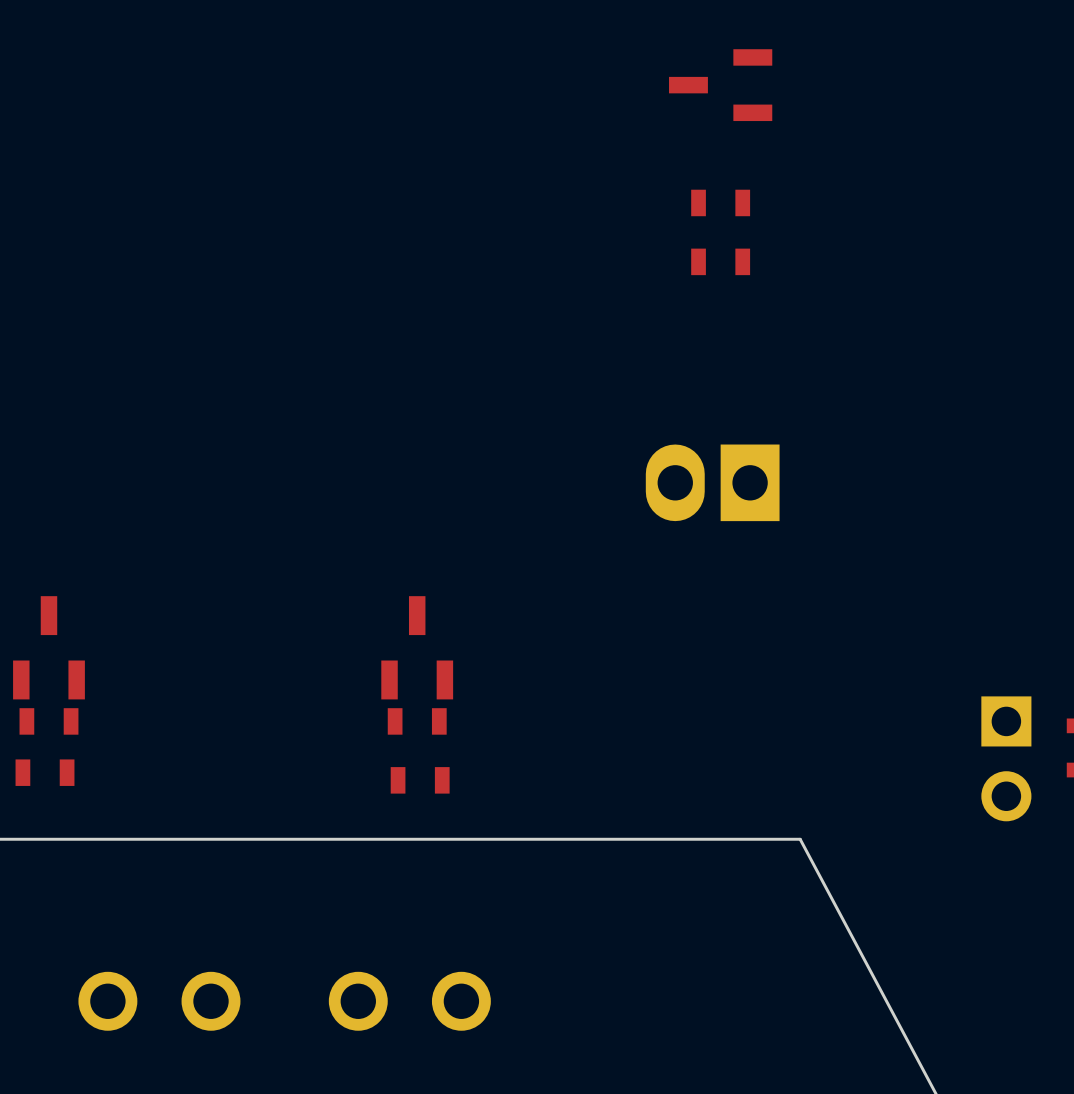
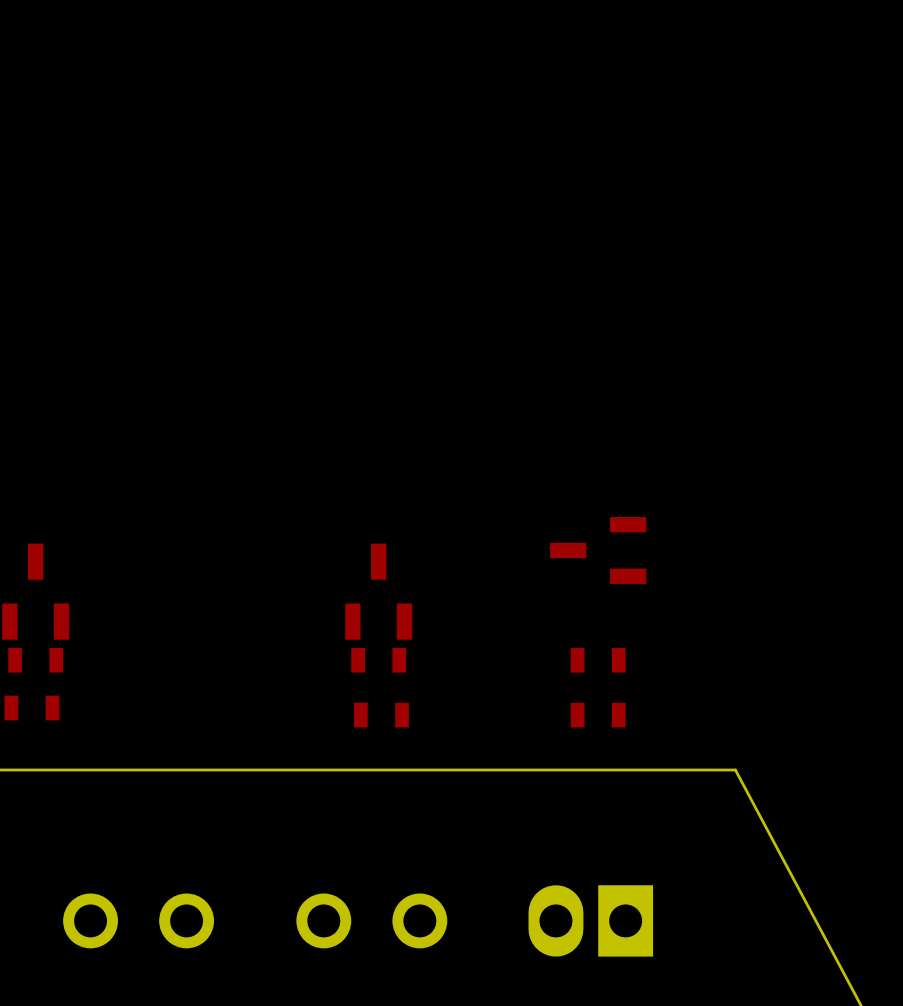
part position: (720, 85) -> (598, 550)
part: (720, 202) -> none
part: (720, 261) -> none
part position: (712, 482) -> (590, 920)
part: none -> (598, 660)
part: none -> (598, 715)

